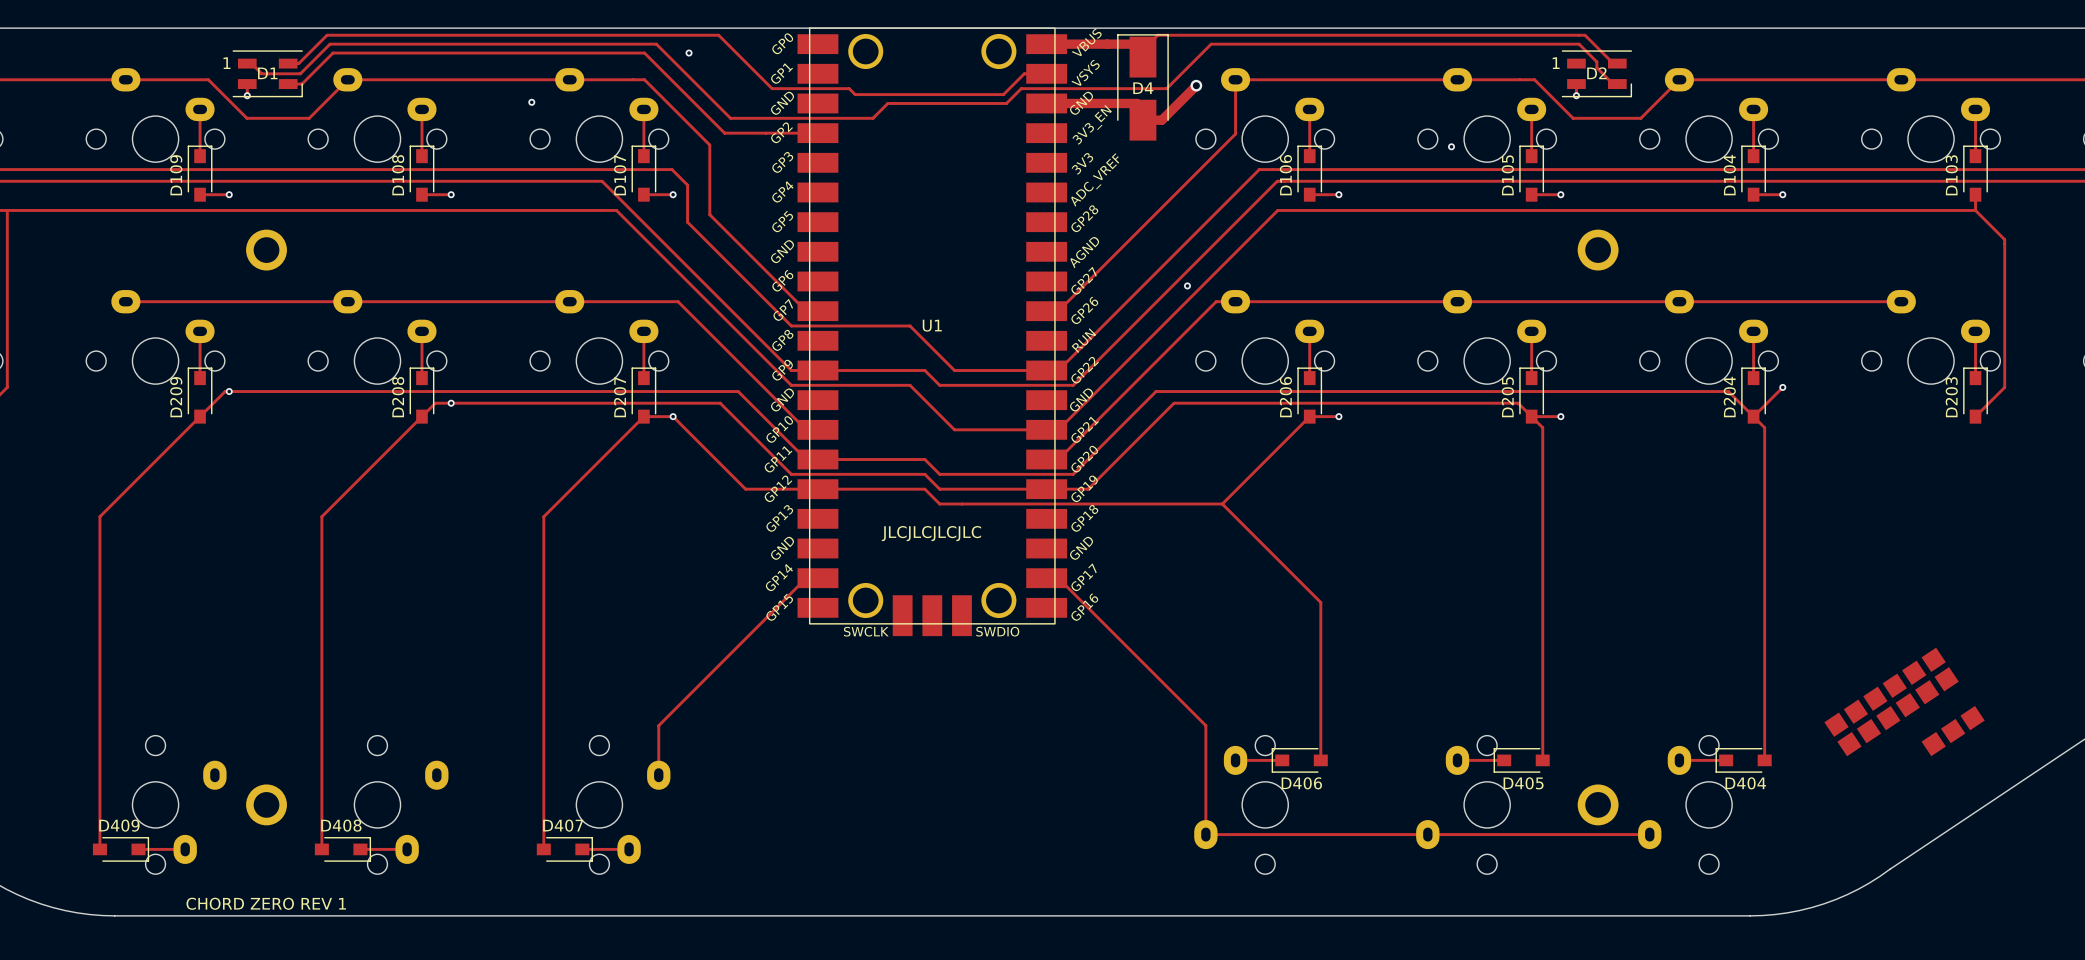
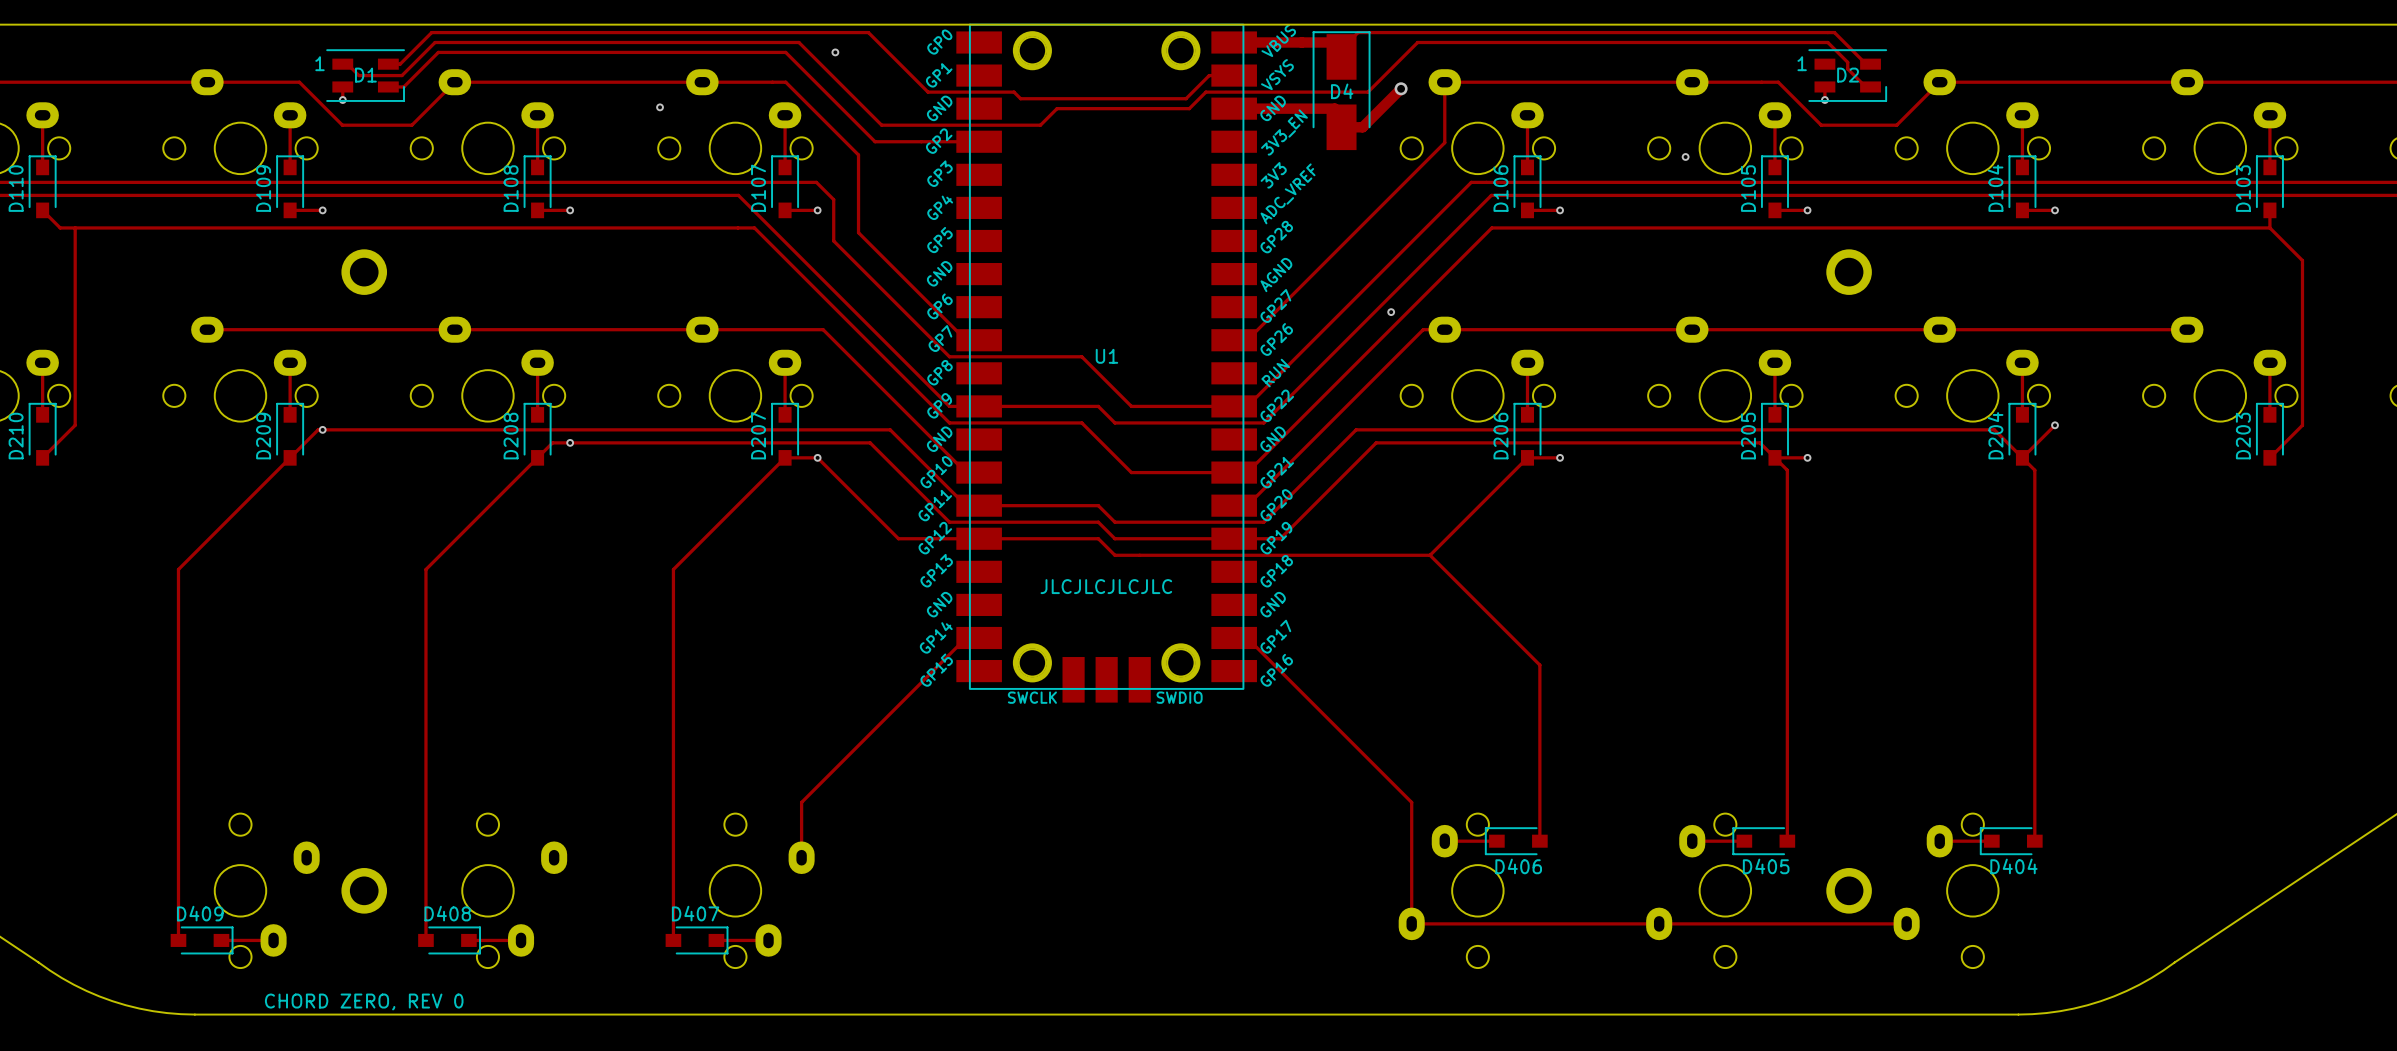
U1 footprint: [797, 27, 1068, 637] -> [956, 23, 1257, 703]
part: (1904, 701) -> none
text: CHORD ZERO REV 1 (266, 903) -> CHORD ZERO, REV 0 (364, 1001)

